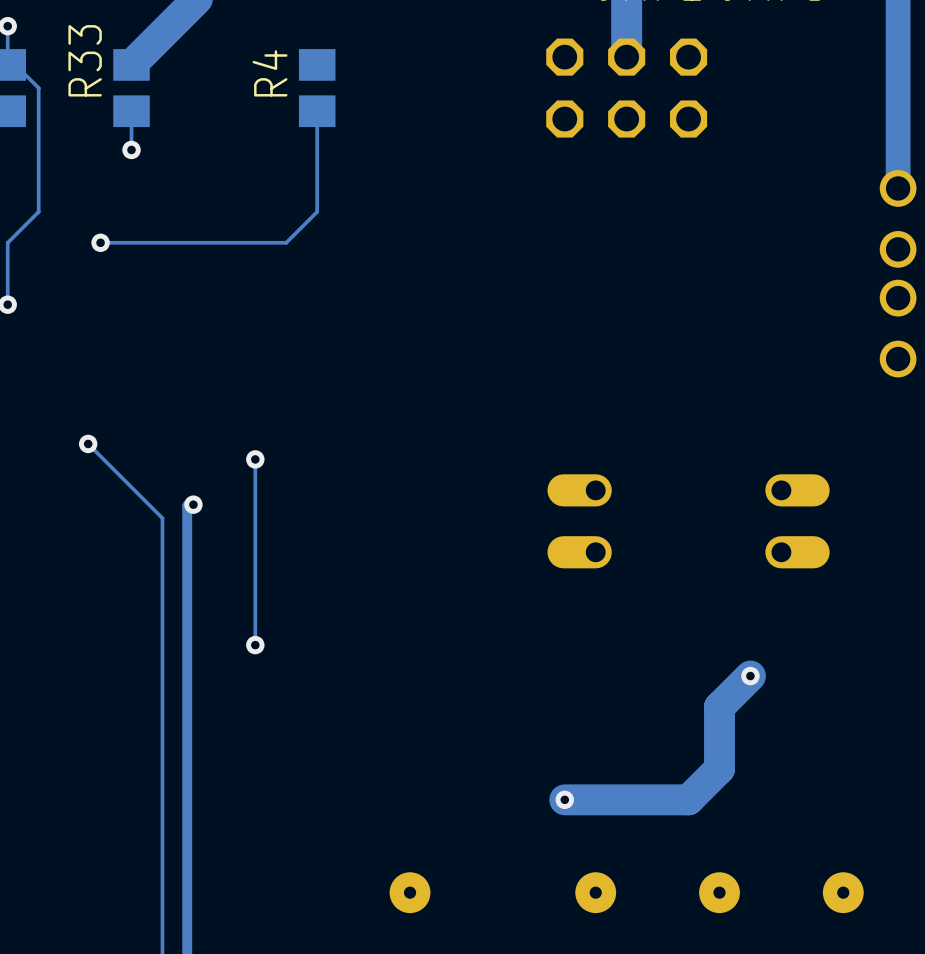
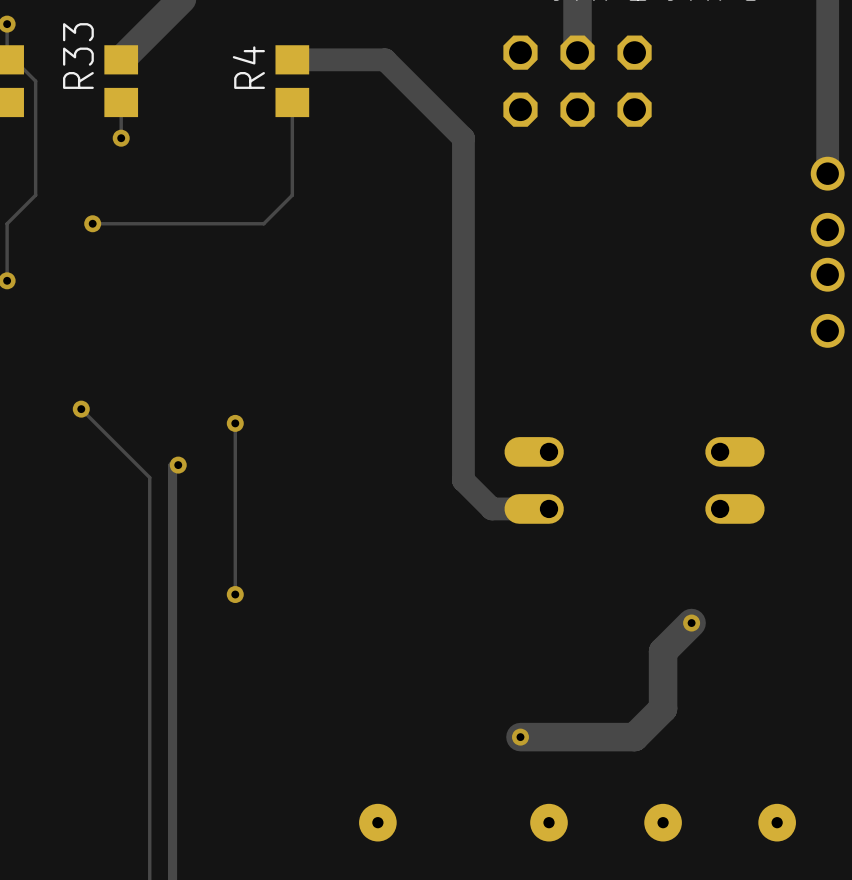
track: none -> (292, 59) (385, 59) (463, 138) (463, 480) (491, 508) (549, 508)

